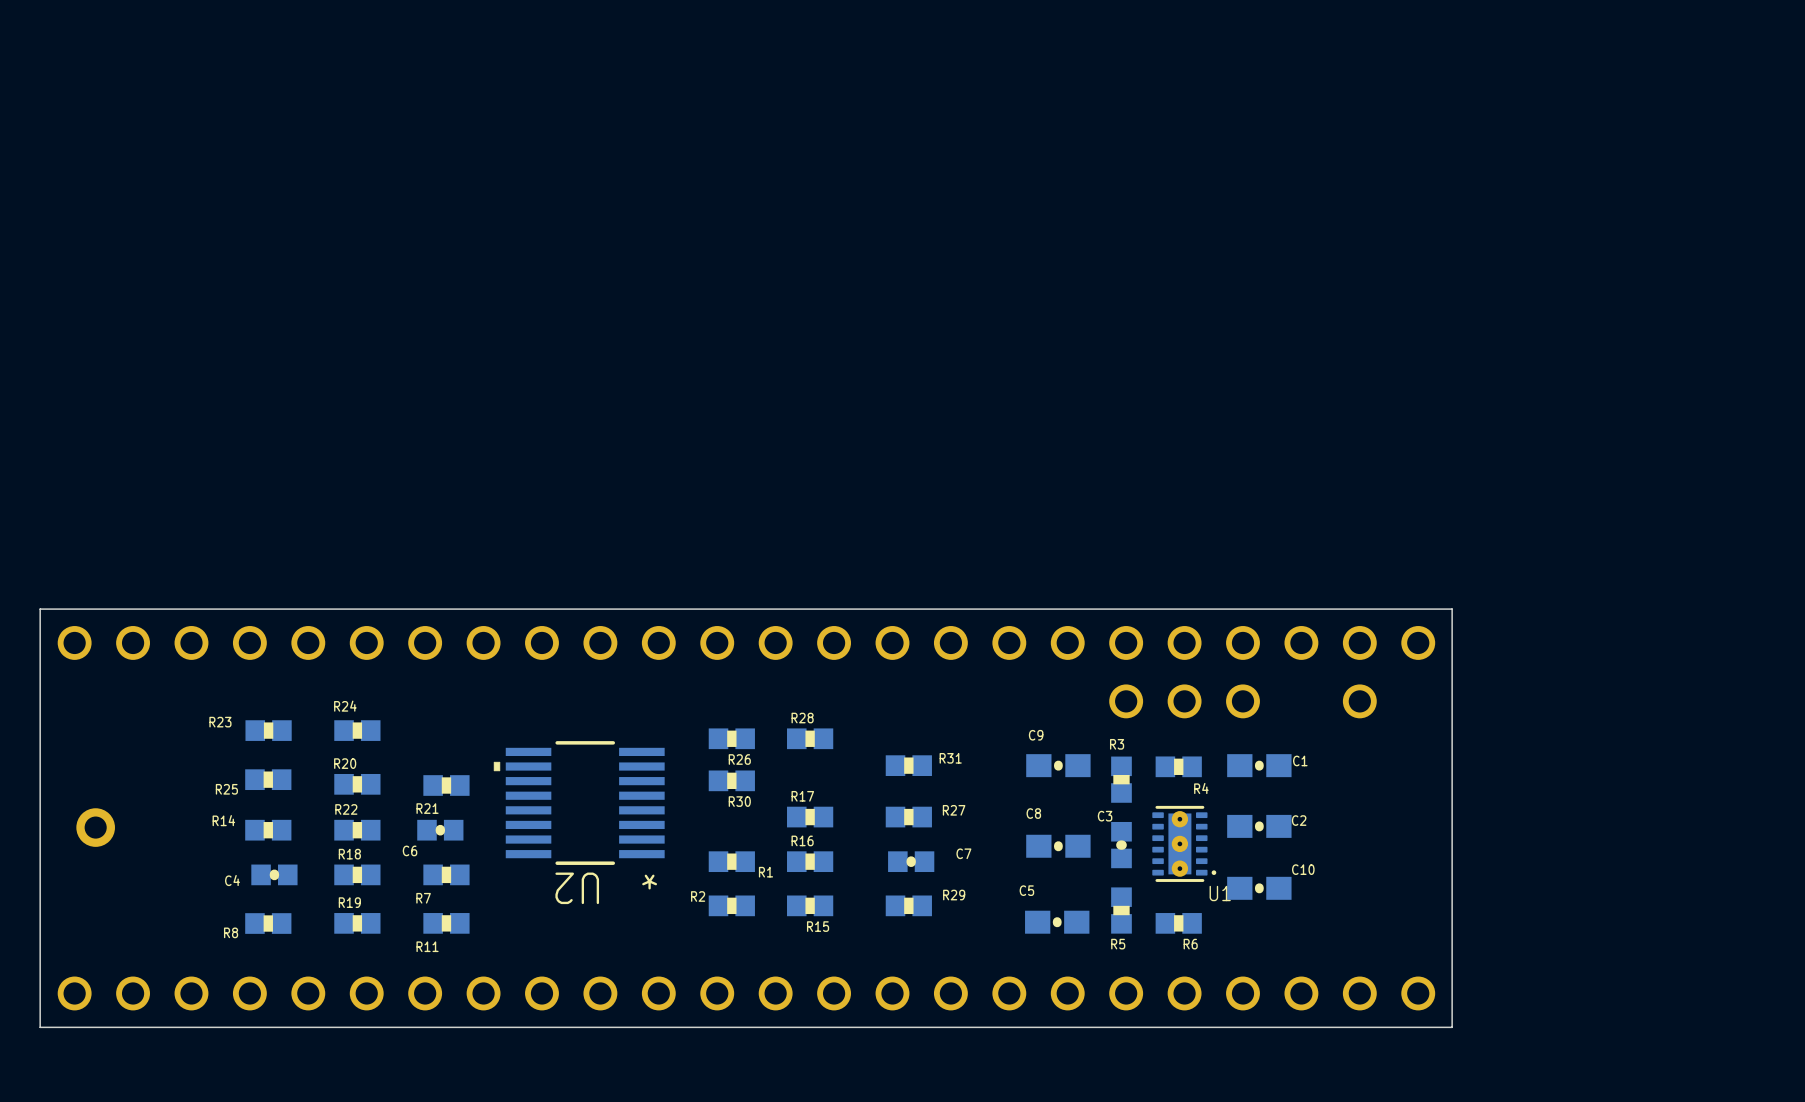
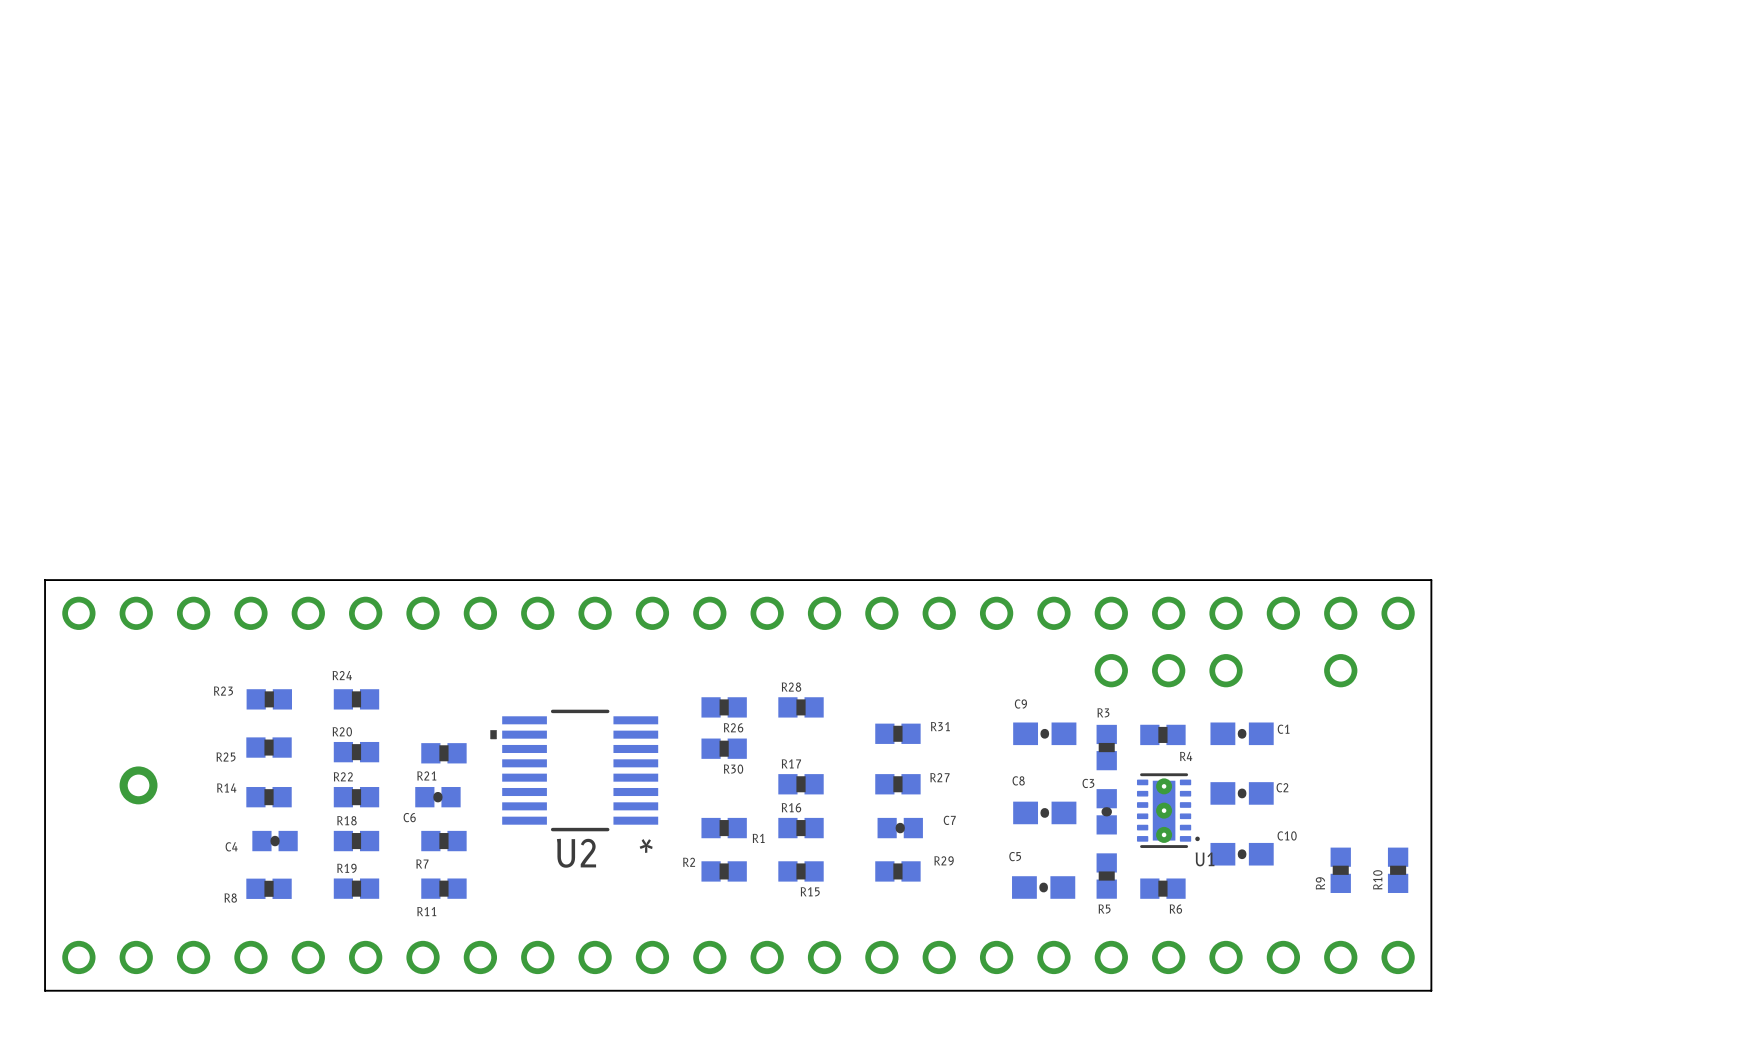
part position: (95, 827) -> (138, 785)
U2 name rotation: 0° (577, 888) -> 180° (576, 853)
R9: none -> (1340, 870)
R10: none -> (1398, 870)

